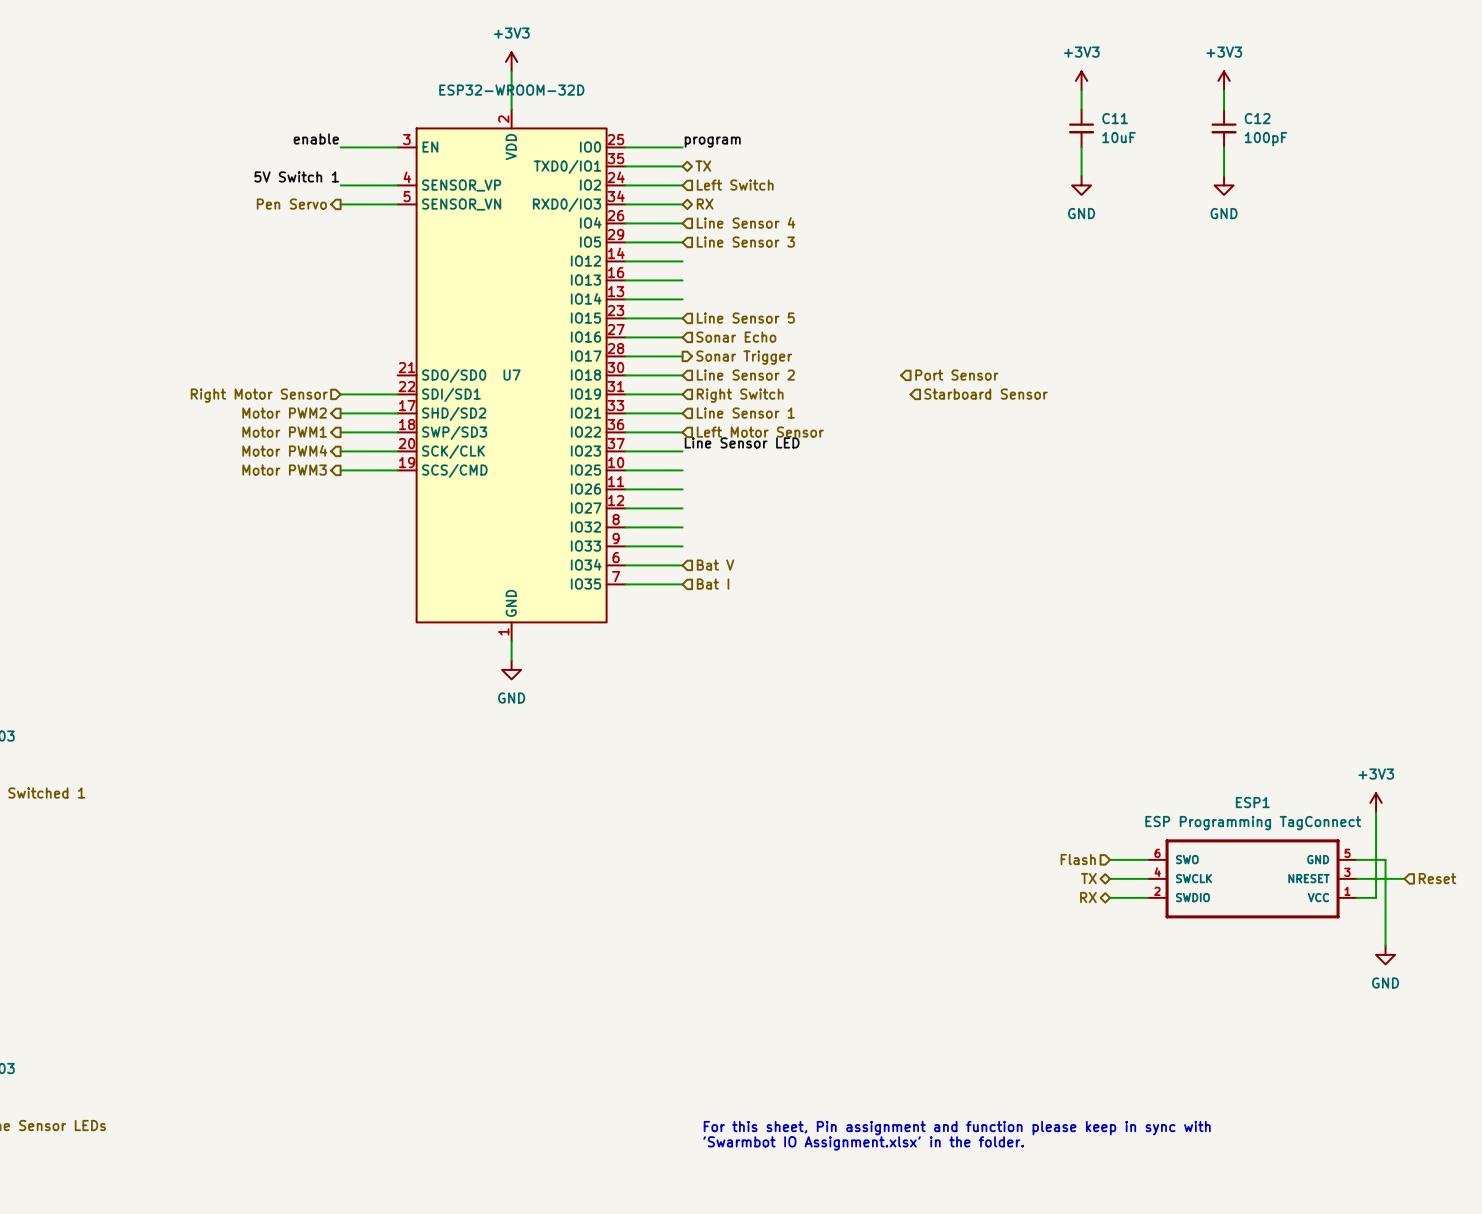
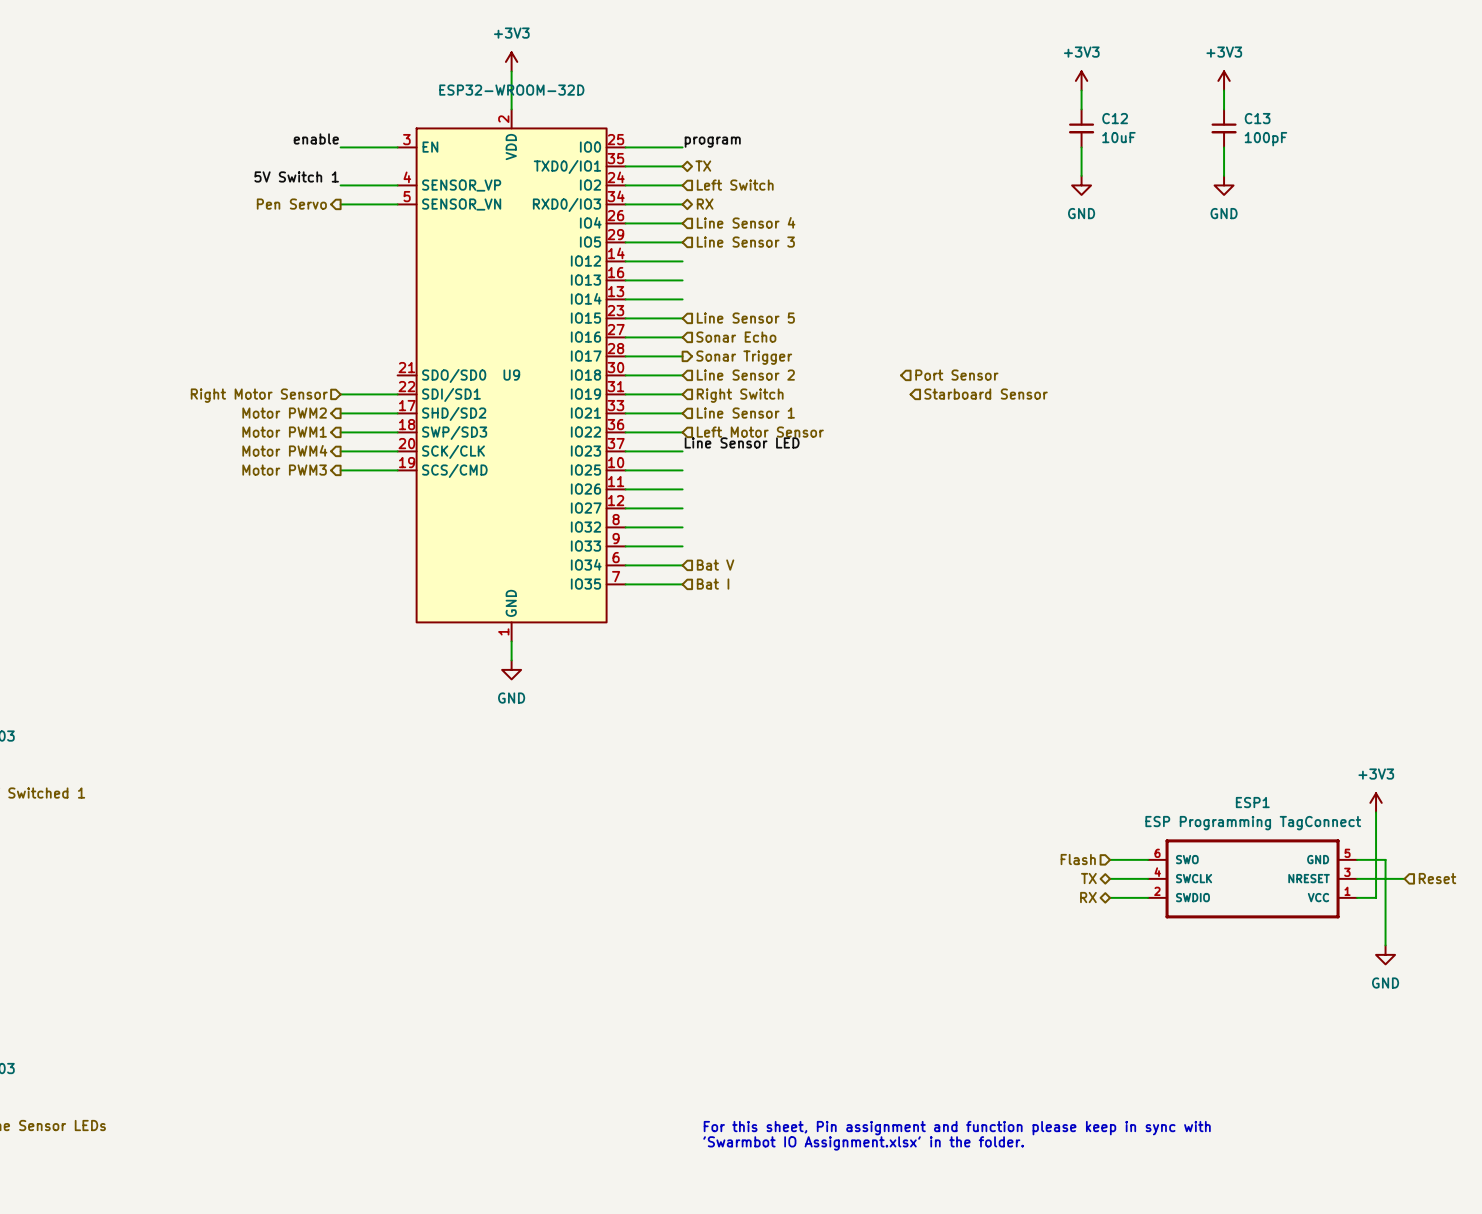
C11 name: C11 (1115, 118) -> C12 (1115, 118)
C12 name: C12 (1257, 118) -> C13 (1257, 118)
U7 name: U7 (512, 375) -> U9 (511, 375)

